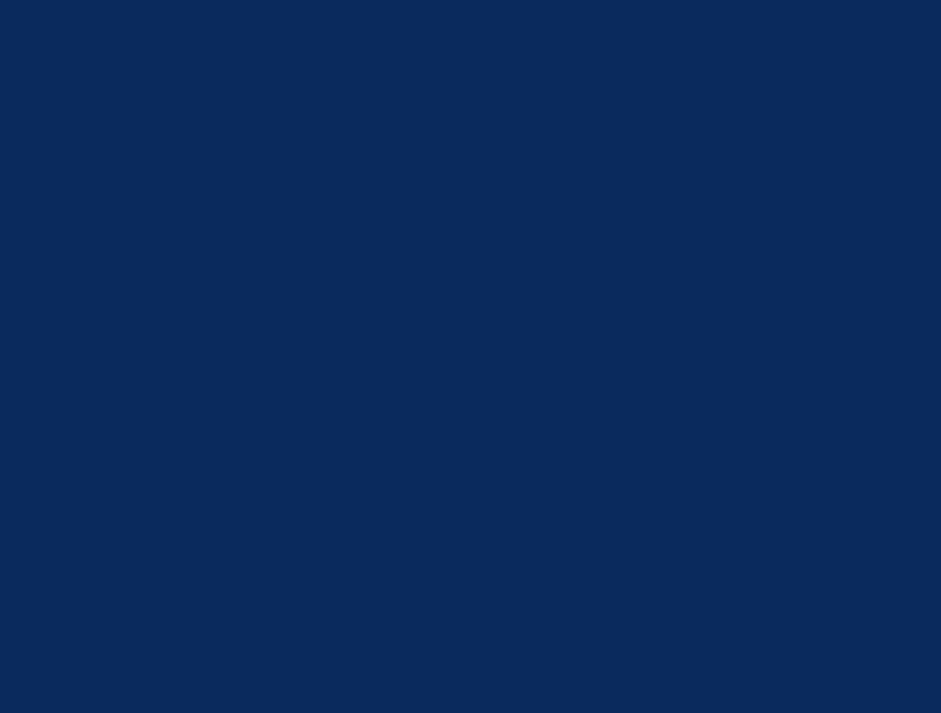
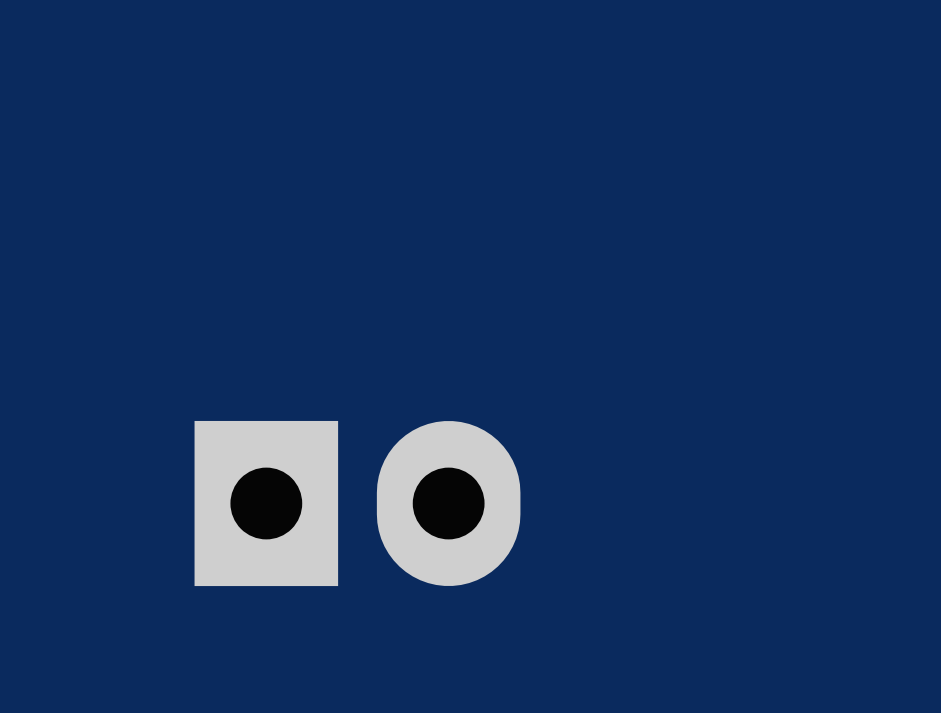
part: none -> (357, 503)

